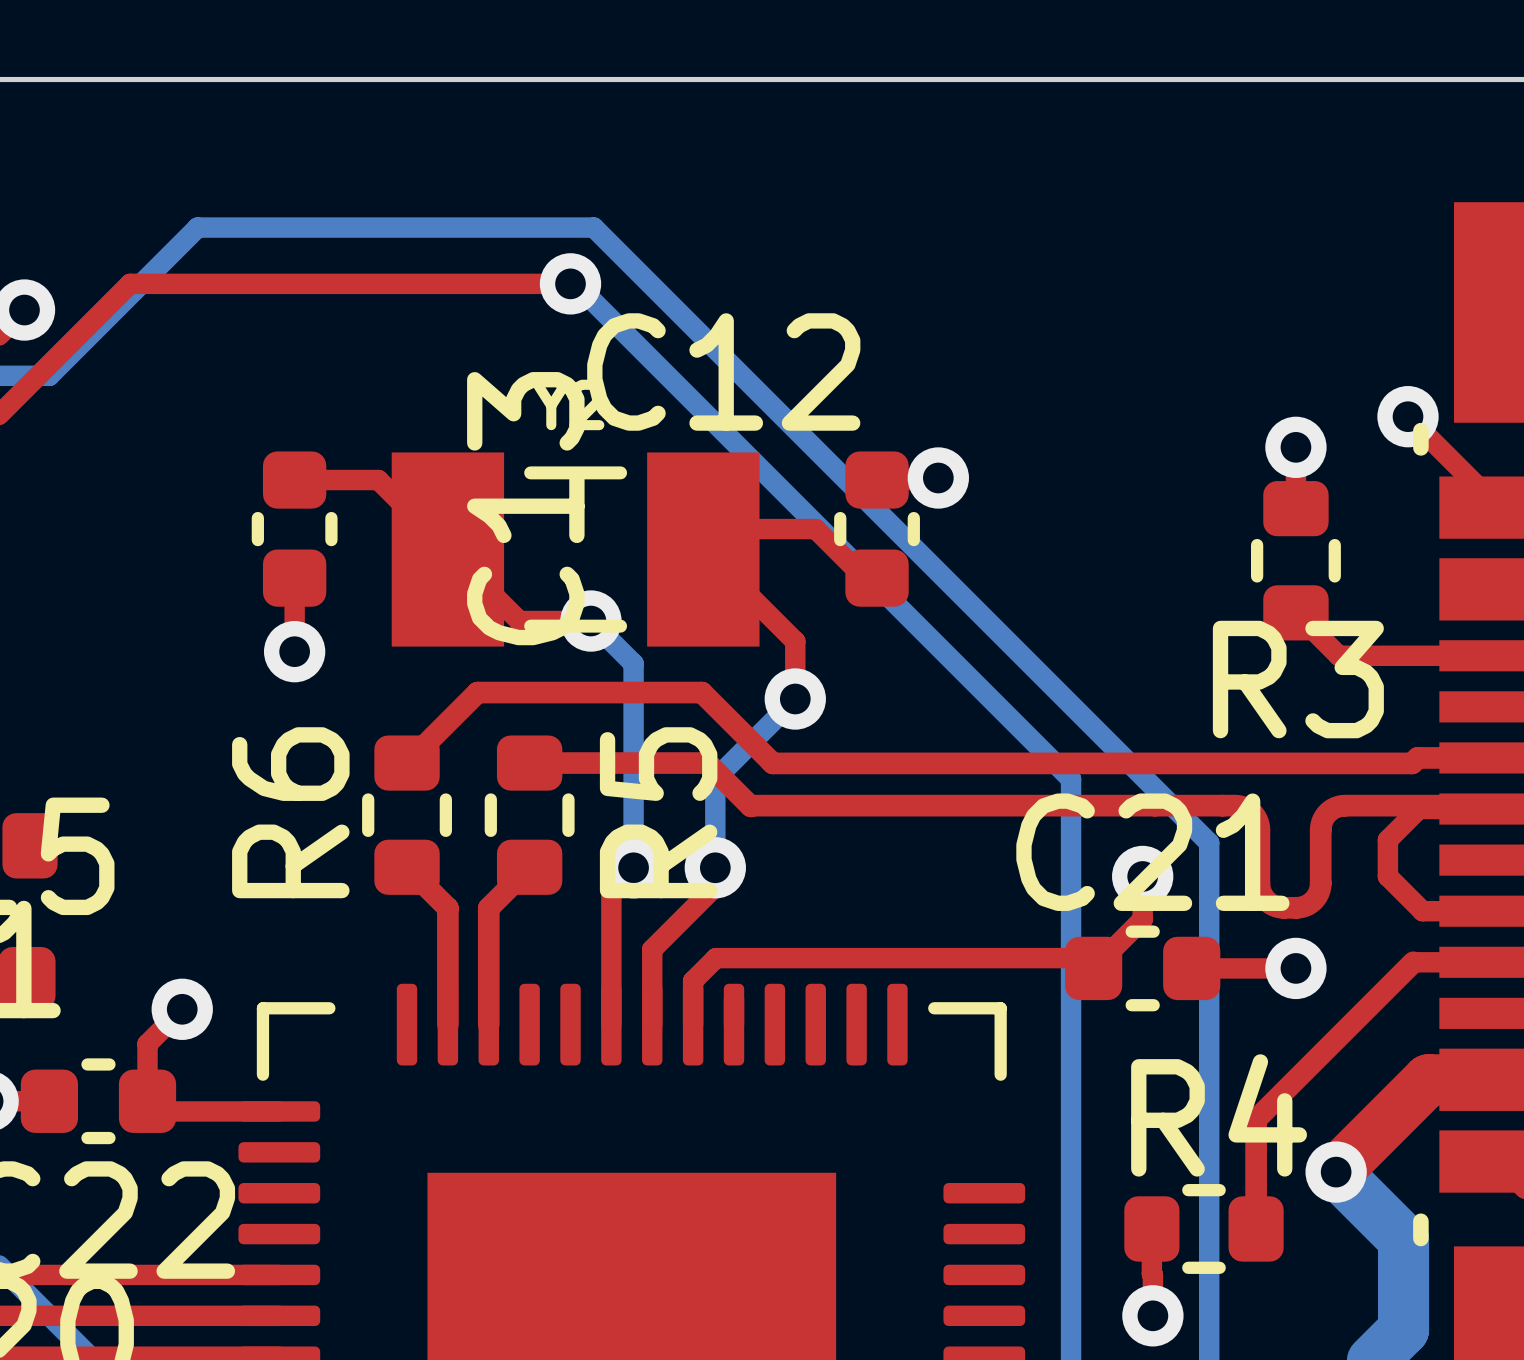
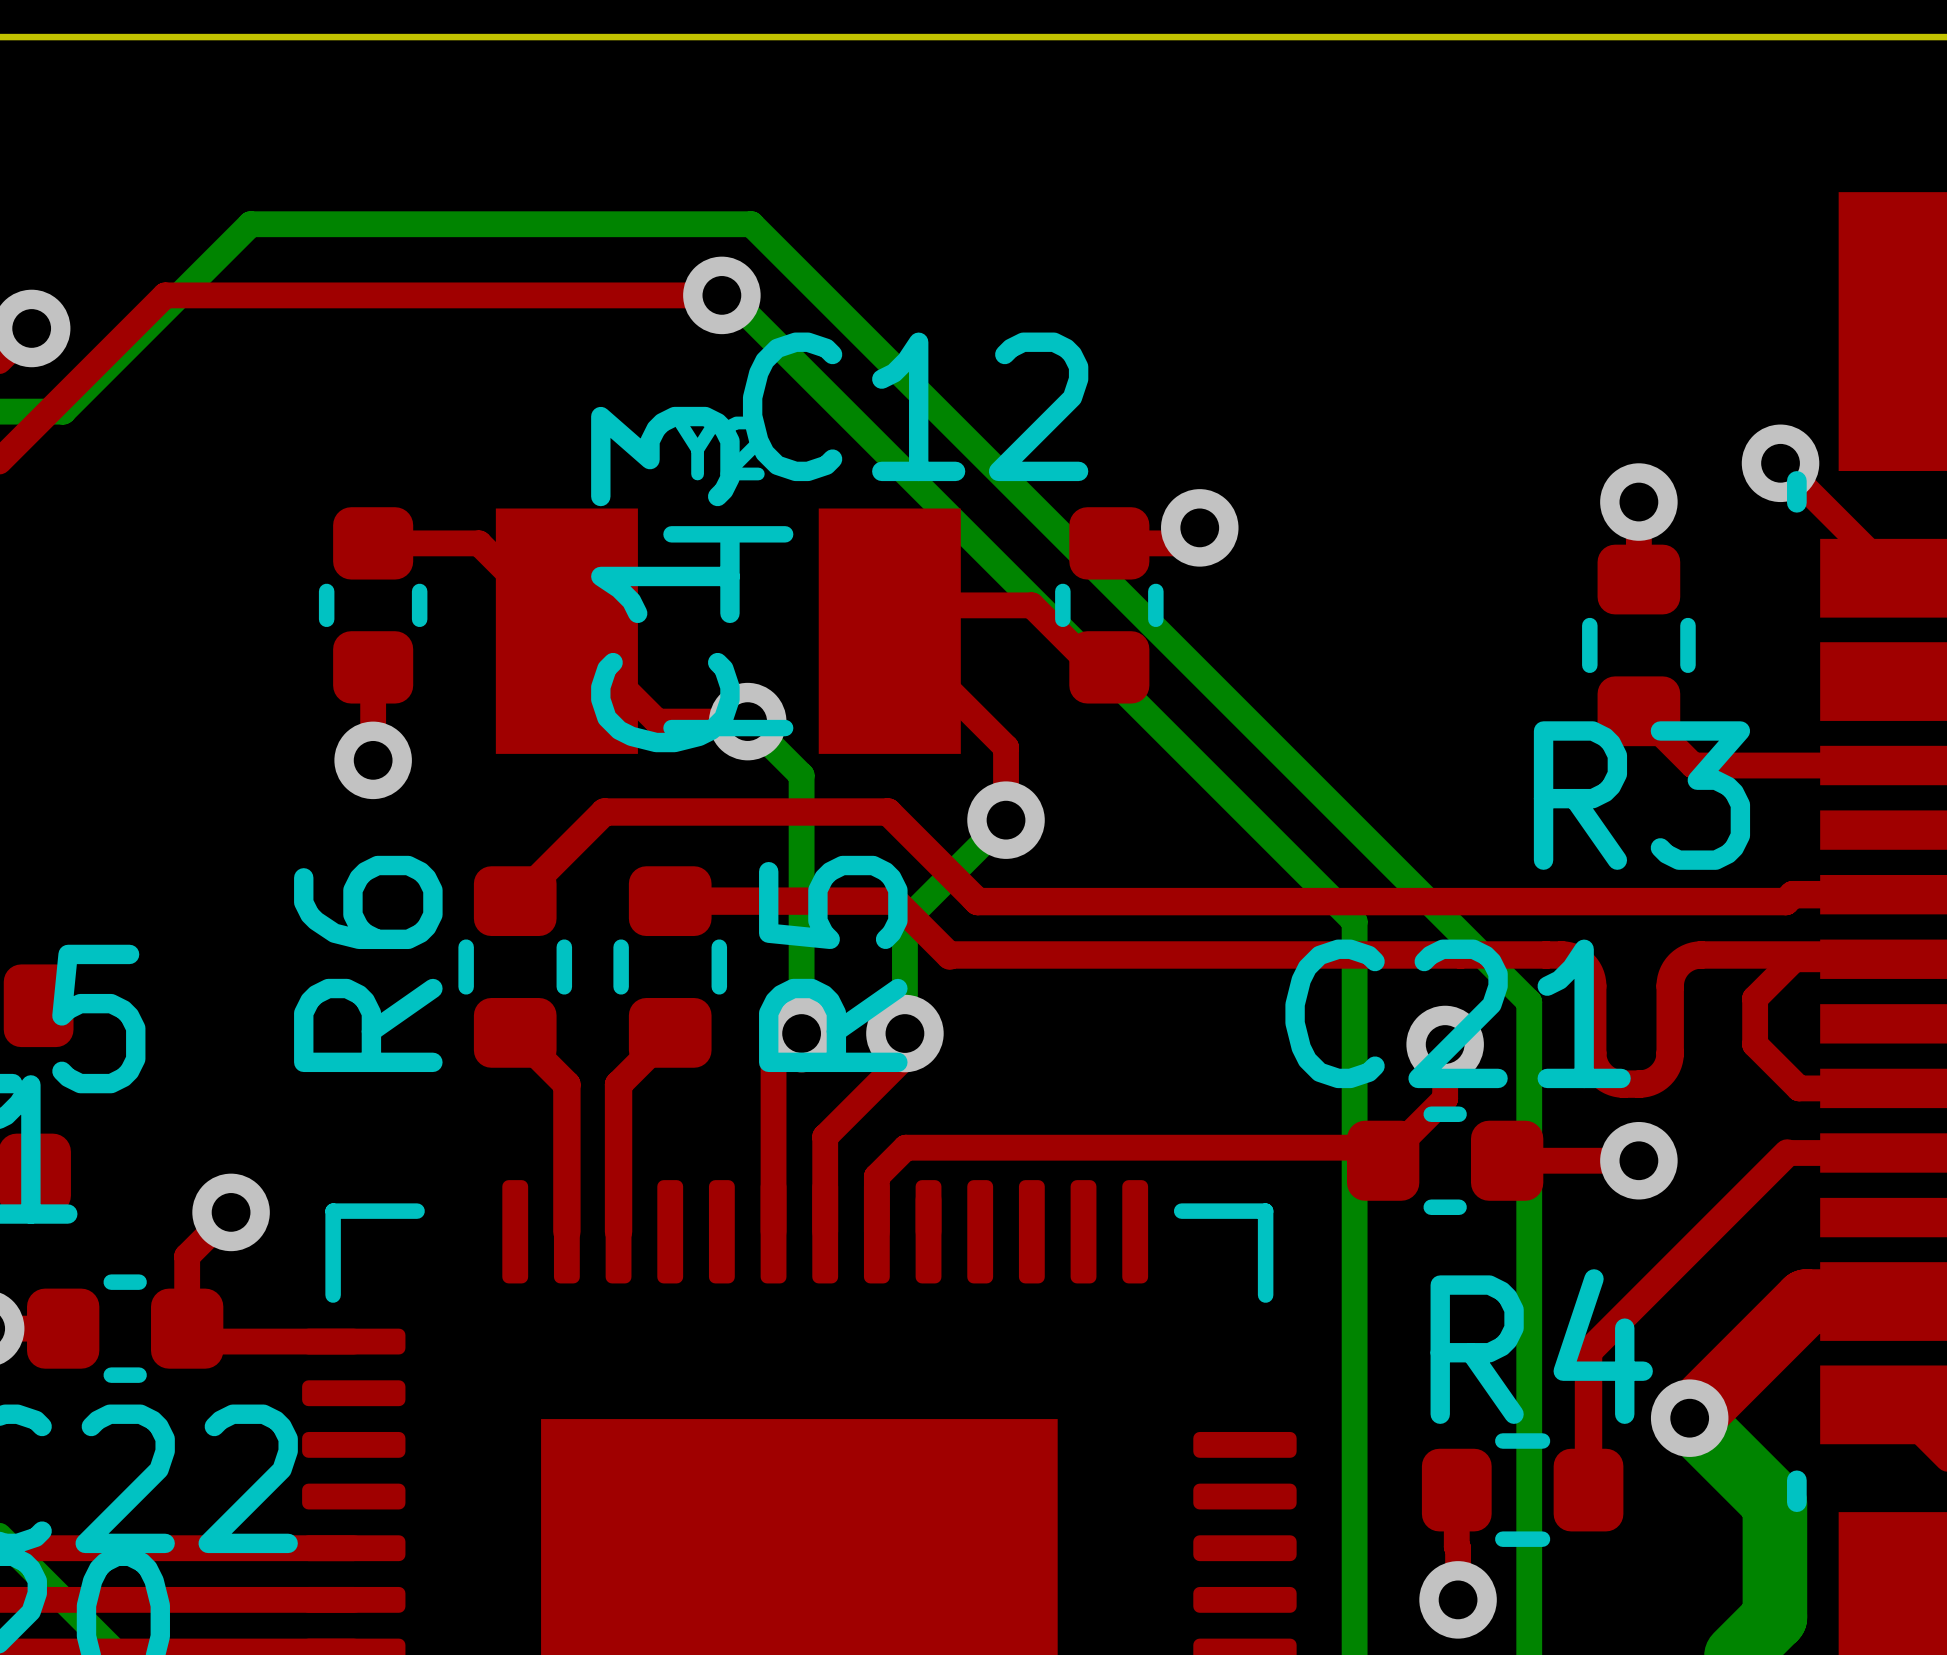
via position: (938, 477) -> (1199, 527)

